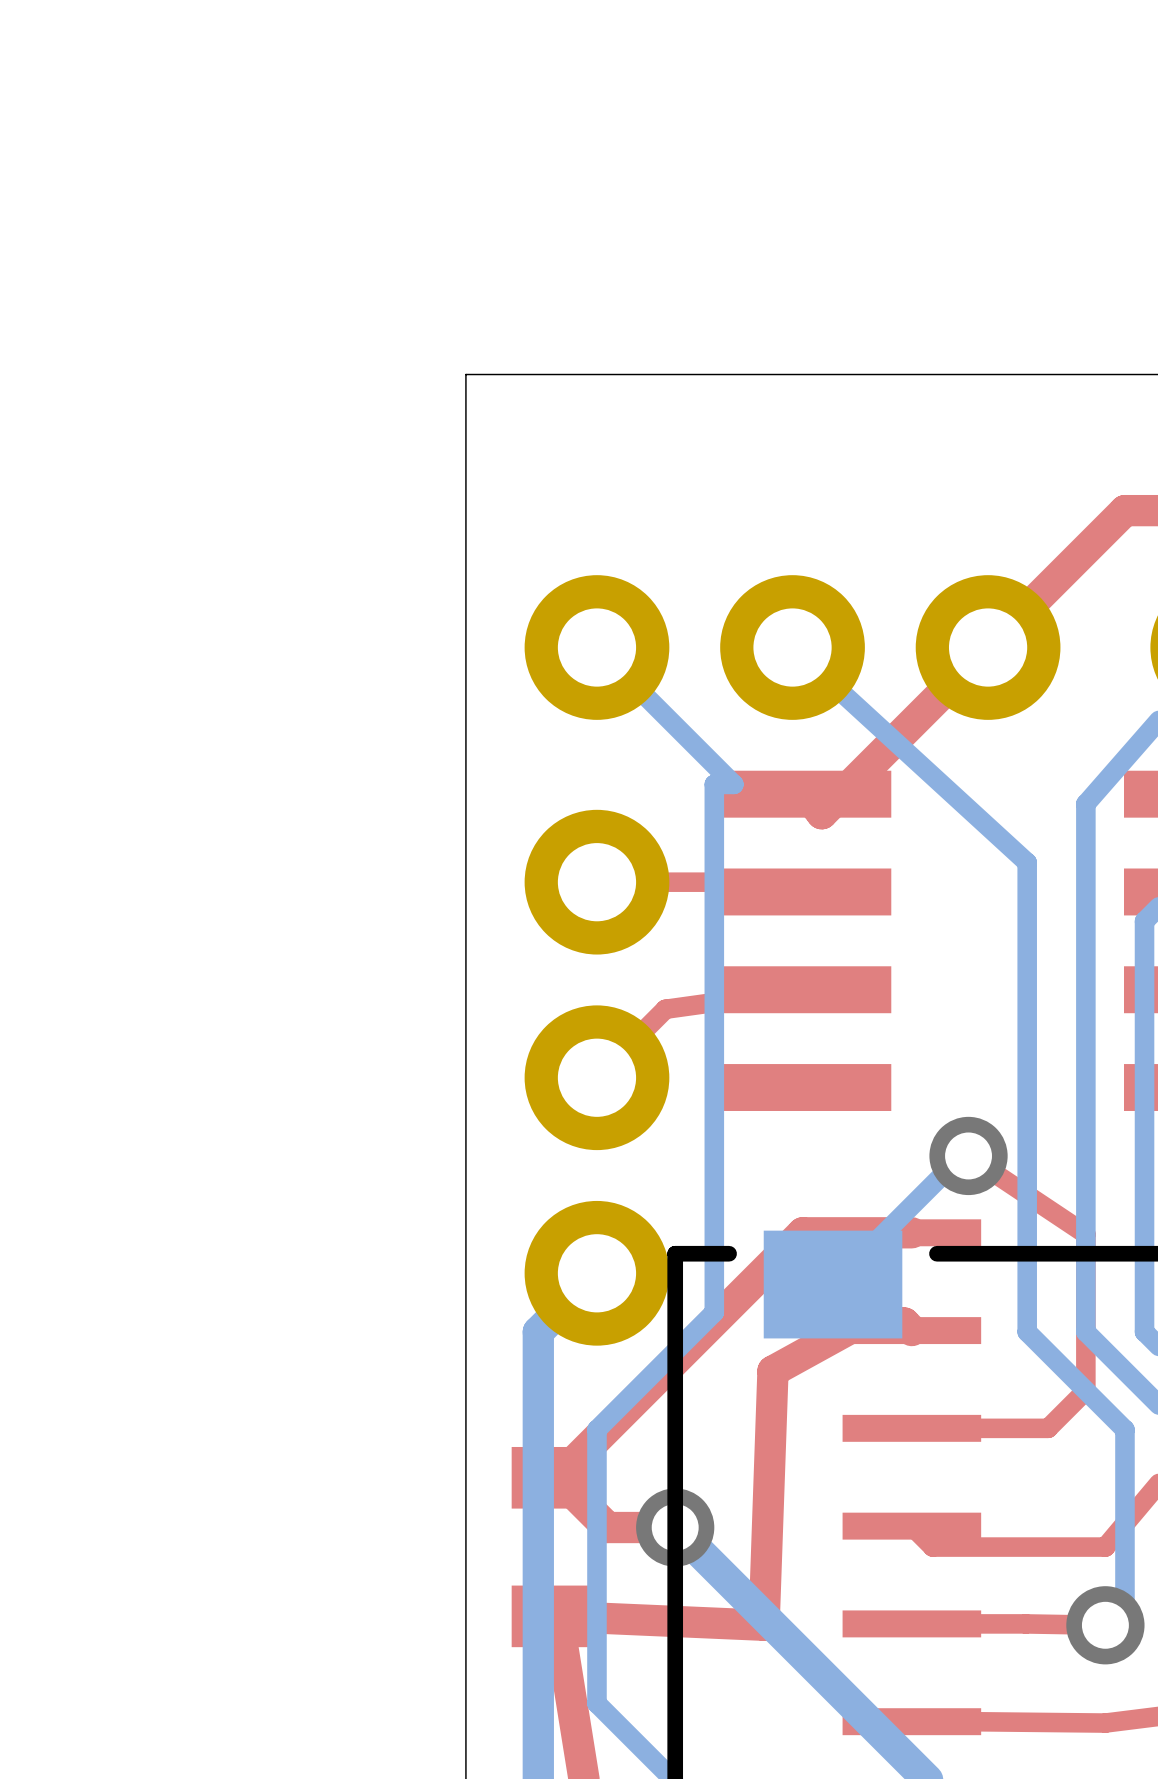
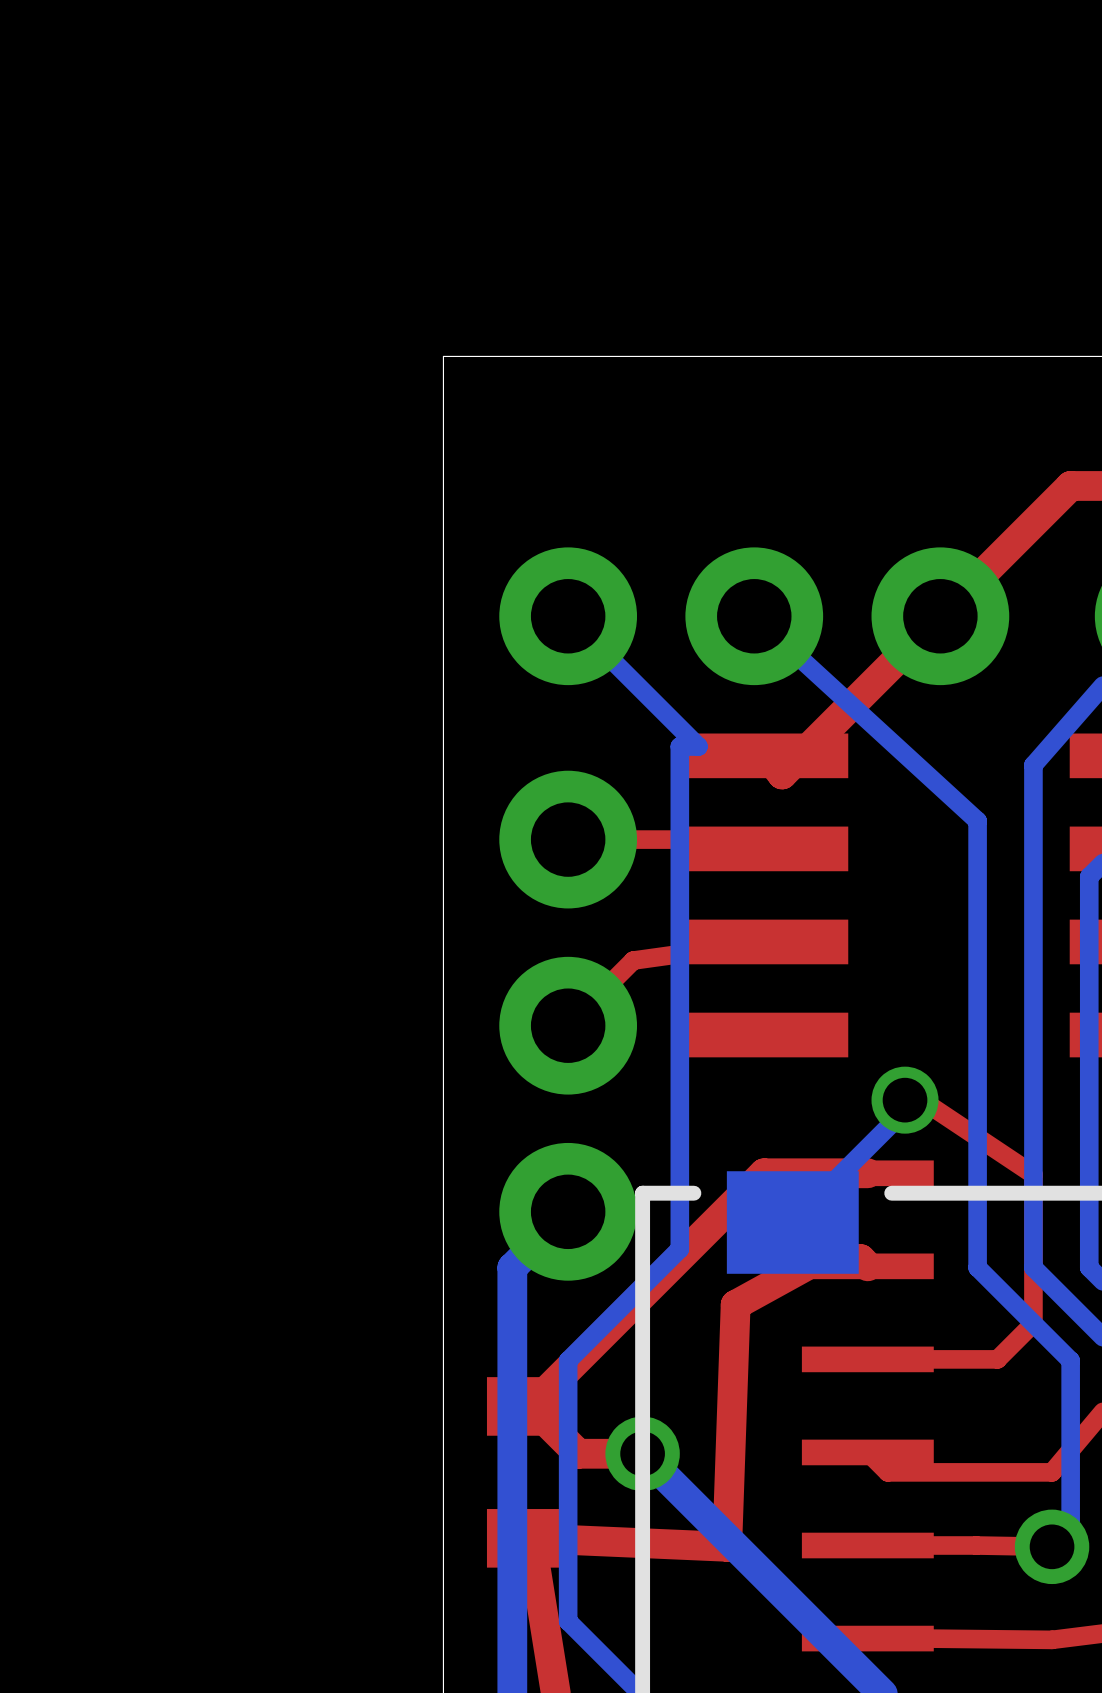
via position: (968, 1155) -> (905, 1100)

